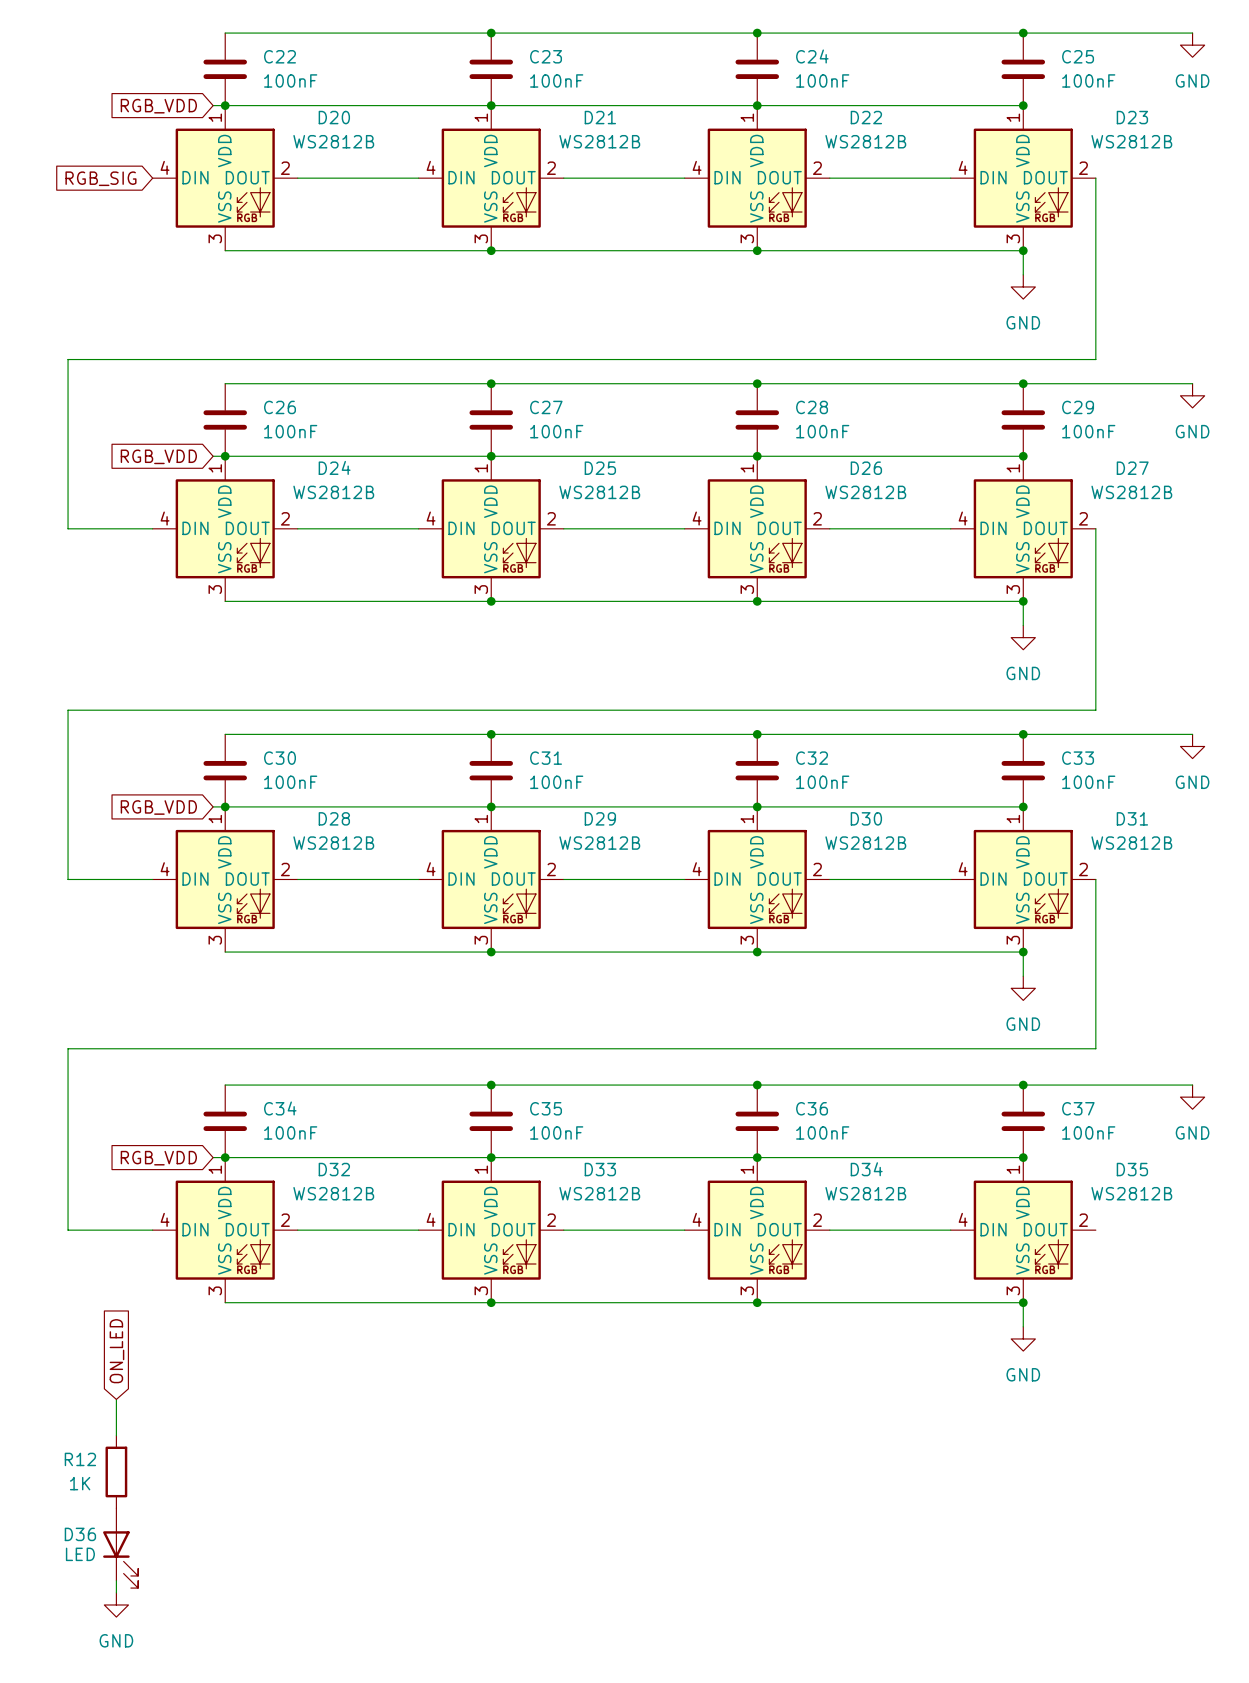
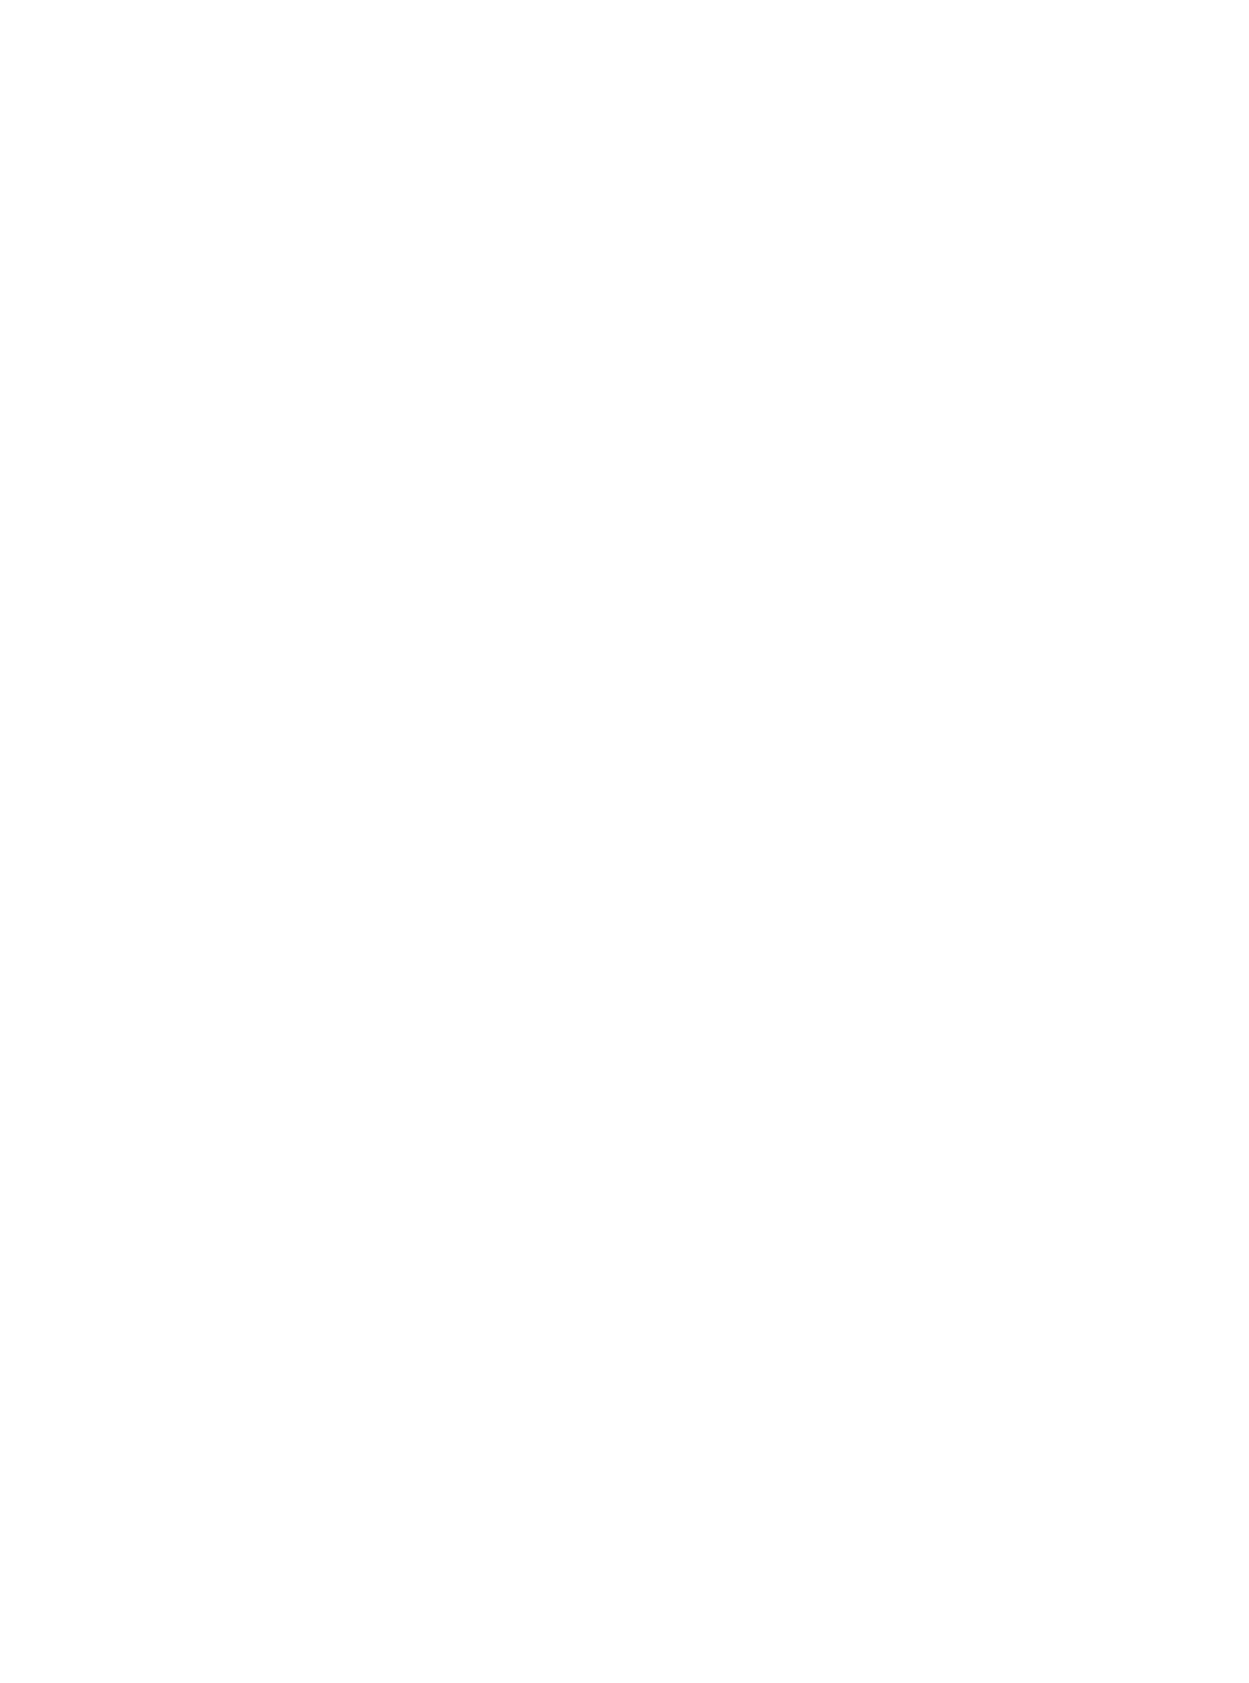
wire: (225, 33) (1192, 33) -> none
junction: (491, 33) -> none
junction: (757, 33) -> none
junction: (1023, 33) -> none
power symbol: GND (1192, 45) -> none
C22: 100nF (225, 69) -> none
C23: 100nF (491, 69) -> none
C24: 100nF (757, 69) -> none
C25: 100nF (1023, 69) -> none
wire: (213, 105) (1023, 105) -> none
junction: (225, 105) -> none
junction: (491, 105) -> none
junction: (757, 105) -> none
junction: (1023, 105) -> none
global label: RGB_VDD (158, 106) -> none
global label: RGB_SIG (100, 178) -> none
D20: WS2812B (225, 178) -> none
wire: (297, 178) (418, 178) -> none
D21: WS2812B (491, 178) -> none
wire: (563, 178) (684, 178) -> none
D22: WS2812B (757, 178) -> none
wire: (829, 178) (950, 178) -> none
D23: WS2812B (1023, 178) -> none
wire: (1095, 178) (1095, 359) (68, 359) (68, 528) (152, 528) -> none
wire: (225, 250) (1023, 250) (1023, 274) -> none
junction: (491, 250) -> none
junction: (757, 250) -> none
junction: (1023, 250) -> none
power symbol: GND (1023, 286) -> none
wire: (225, 383) (1192, 383) -> none
junction: (491, 383) -> none
junction: (757, 383) -> none
junction: (1023, 383) -> none
power symbol: GND (1192, 395) -> none
C26: 100nF (225, 419) -> none
C27: 100nF (491, 419) -> none
C28: 100nF (757, 419) -> none
C29: 100nF (1023, 419) -> none
global label: RGB_VDD (158, 456) -> none
wire: (213, 456) (1023, 456) -> none
junction: (225, 456) -> none
junction: (491, 456) -> none
junction: (757, 456) -> none
junction: (1023, 456) -> none
D24: WS2812B (225, 528) -> none
wire: (297, 528) (418, 528) -> none
D25: WS2812B (491, 528) -> none
wire: (563, 528) (684, 528) -> none
D26: WS2812B (757, 528) -> none
wire: (829, 528) (950, 528) -> none
D27: WS2812B (1023, 528) -> none
wire: (1095, 528) (1095, 710) (68, 710) (68, 879) (152, 879) -> none
wire: (225, 601) (1023, 601) (1023, 625) -> none
junction: (491, 601) -> none
junction: (757, 601) -> none
junction: (1023, 601) -> none
power symbol: GND (1023, 637) -> none
wire: (225, 734) (1192, 734) -> none
junction: (491, 734) -> none
junction: (757, 734) -> none
junction: (1023, 734) -> none
power symbol: GND (1192, 746) -> none
C30: 100nF (225, 770) -> none
C31: 100nF (491, 770) -> none
C32: 100nF (757, 770) -> none
C33: 100nF (1023, 770) -> none
wire: (213, 806) (1023, 806) -> none
junction: (225, 806) -> none
junction: (491, 806) -> none
junction: (757, 806) -> none
junction: (1023, 806) -> none
global label: RGB_VDD (158, 807) -> none
D28: WS2812B (225, 879) -> none
wire: (297, 879) (418, 879) -> none
D29: WS2812B (491, 879) -> none
wire: (563, 879) (684, 879) -> none
D30: WS2812B (757, 879) -> none
wire: (829, 879) (950, 879) -> none
D31: WS2812B (1023, 879) -> none
wire: (1095, 879) (1095, 1048) (68, 1048) (68, 1230) (152, 1230) -> none
wire: (225, 952) (1023, 952) (1023, 976) -> none
junction: (491, 952) -> none
junction: (757, 952) -> none
junction: (1023, 952) -> none
power symbol: GND (1023, 988) -> none
wire: (225, 1085) (1192, 1085) -> none
junction: (491, 1085) -> none
junction: (757, 1085) -> none
junction: (1023, 1085) -> none
power symbol: GND (1192, 1097) -> none
C34: 100nF (225, 1121) -> none
C35: 100nF (491, 1121) -> none
C36: 100nF (757, 1121) -> none
C37: 100nF (1023, 1121) -> none
wire: (213, 1157) (1023, 1157) -> none
junction: (225, 1157) -> none
junction: (491, 1157) -> none
junction: (757, 1157) -> none
junction: (1023, 1157) -> none
global label: RGB_VDD (158, 1158) -> none
D32: WS2812B (225, 1230) -> none
wire: (297, 1230) (418, 1230) -> none
D33: WS2812B (491, 1230) -> none
wire: (563, 1230) (684, 1230) -> none
D34: WS2812B (757, 1230) -> none
wire: (829, 1230) (950, 1230) -> none
D35: WS2812B (1023, 1230) -> none
wire: (225, 1302) (1023, 1302) (1023, 1326) -> none
junction: (491, 1302) -> none
junction: (757, 1302) -> none
junction: (1023, 1302) -> none
power symbol: GND (1023, 1338) -> none
global label: ON_LED (116, 1351) -> none
wire: (116, 1399) (116, 1435) -> none
R12: 1K (116, 1471) -> none
D36: LED (120, 1548) -> none
wire: (116, 1580) (116, 1592) -> none
power symbol: GND (116, 1604) -> none

